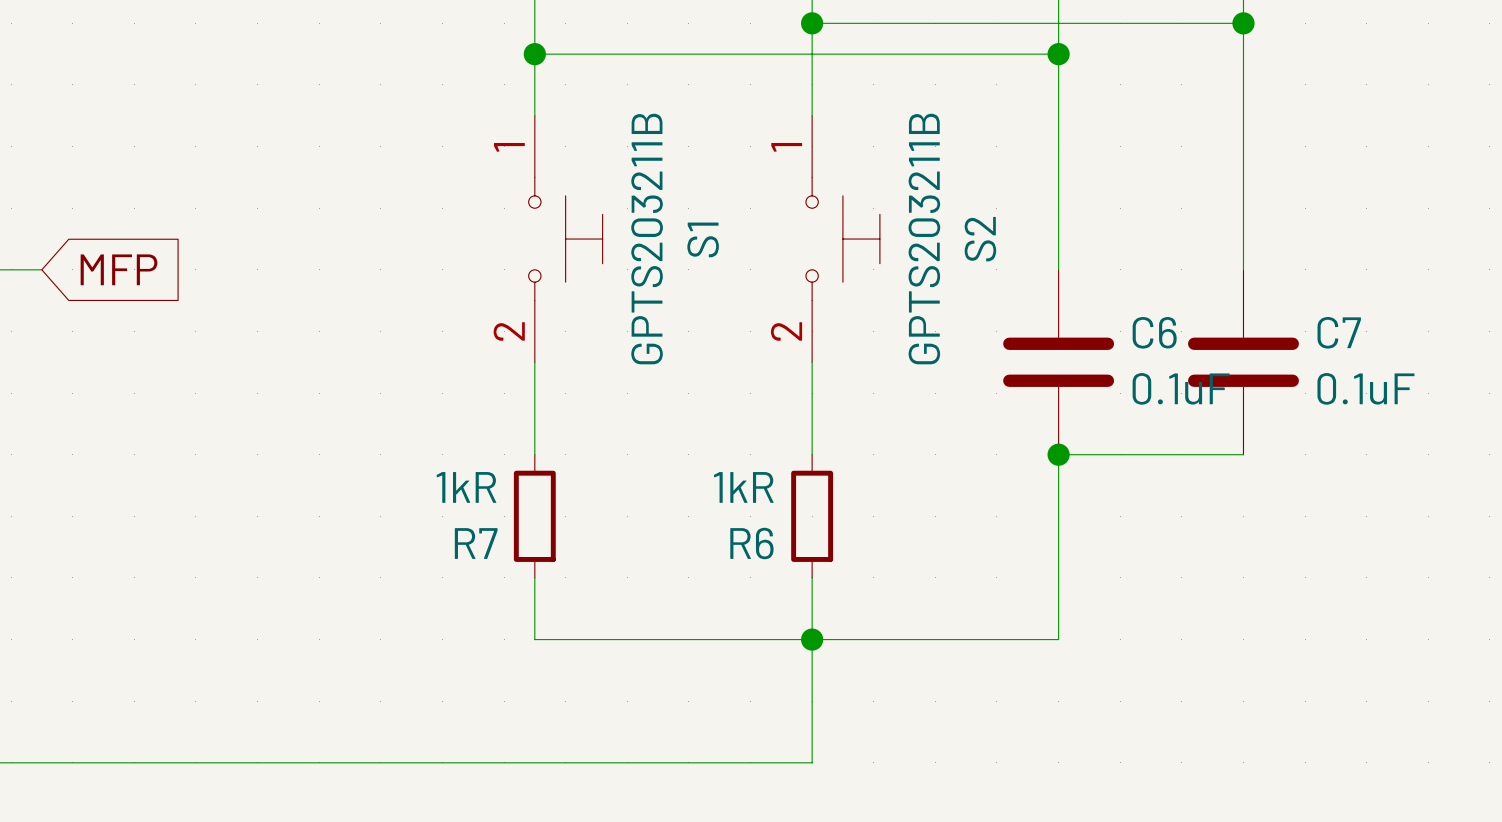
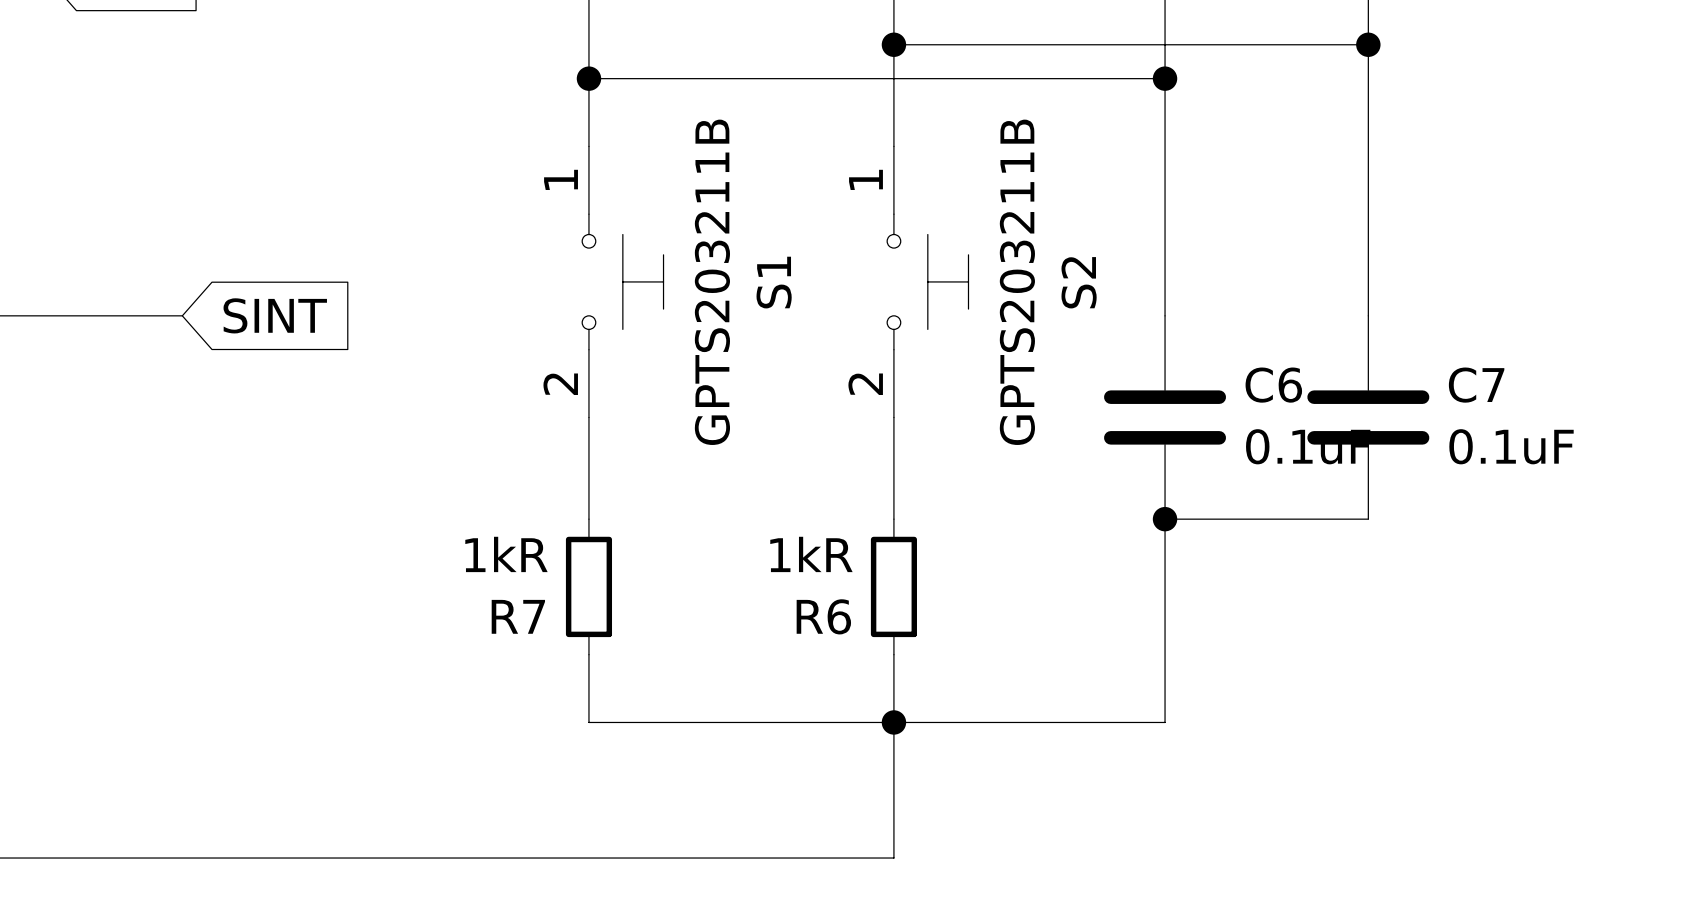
wire: none -> (46, 315) (182, 315)
global label: MFP (119, 269) -> none
global label: none -> SINT (275, 315)

